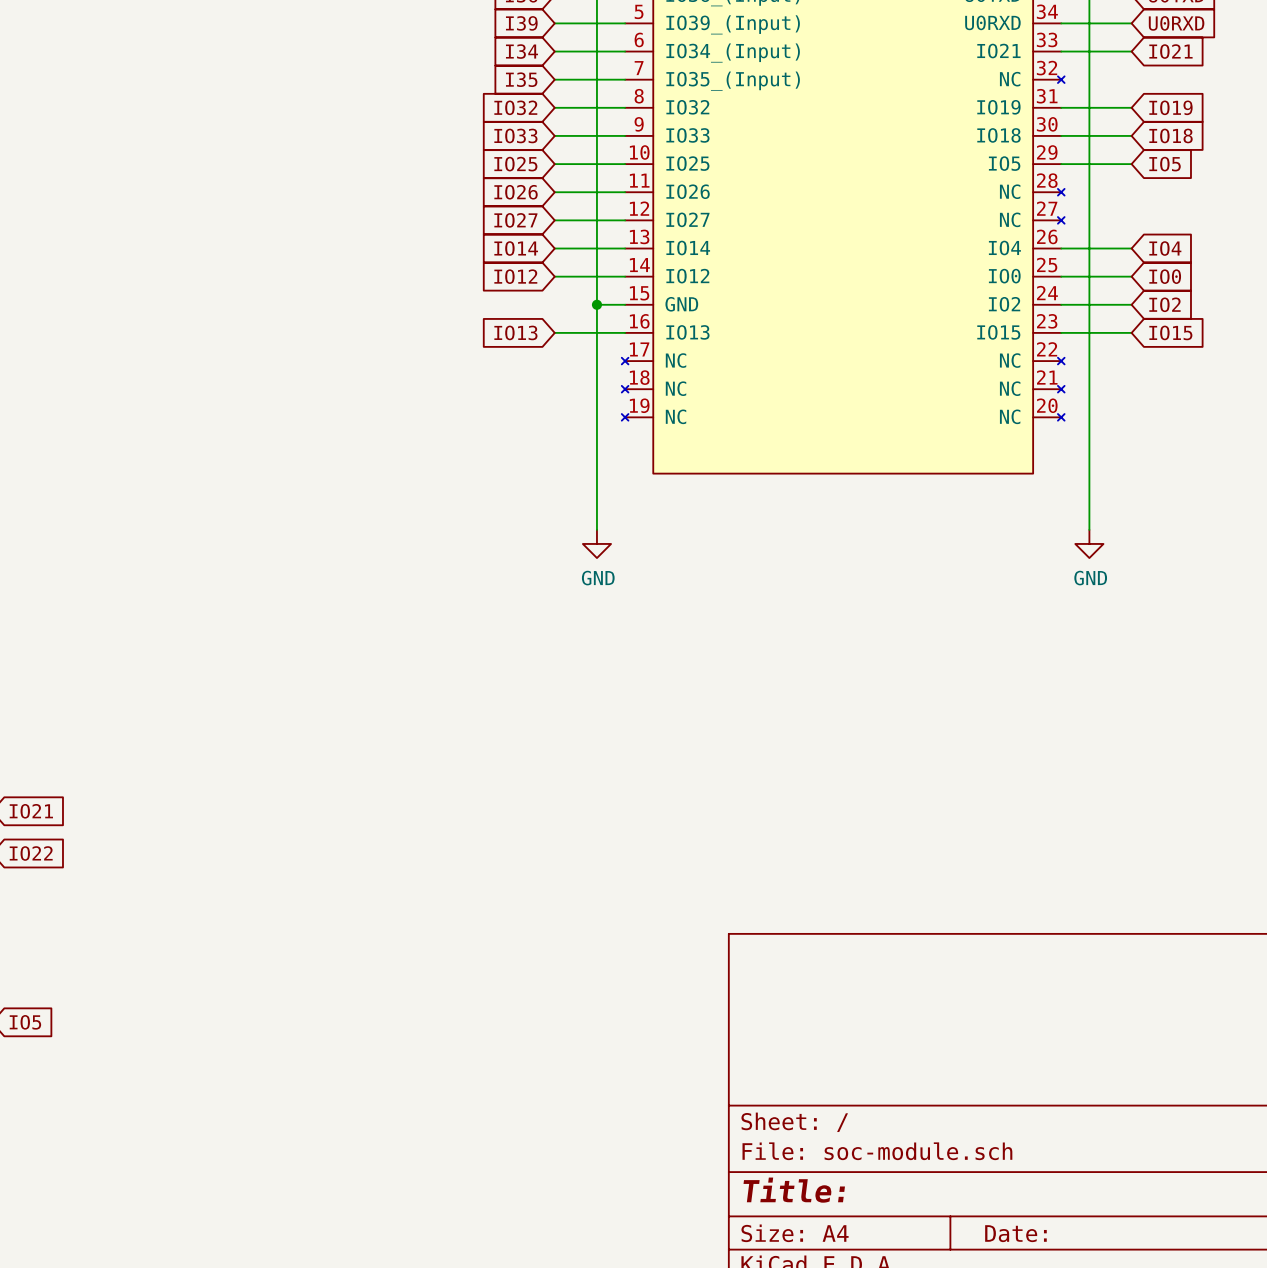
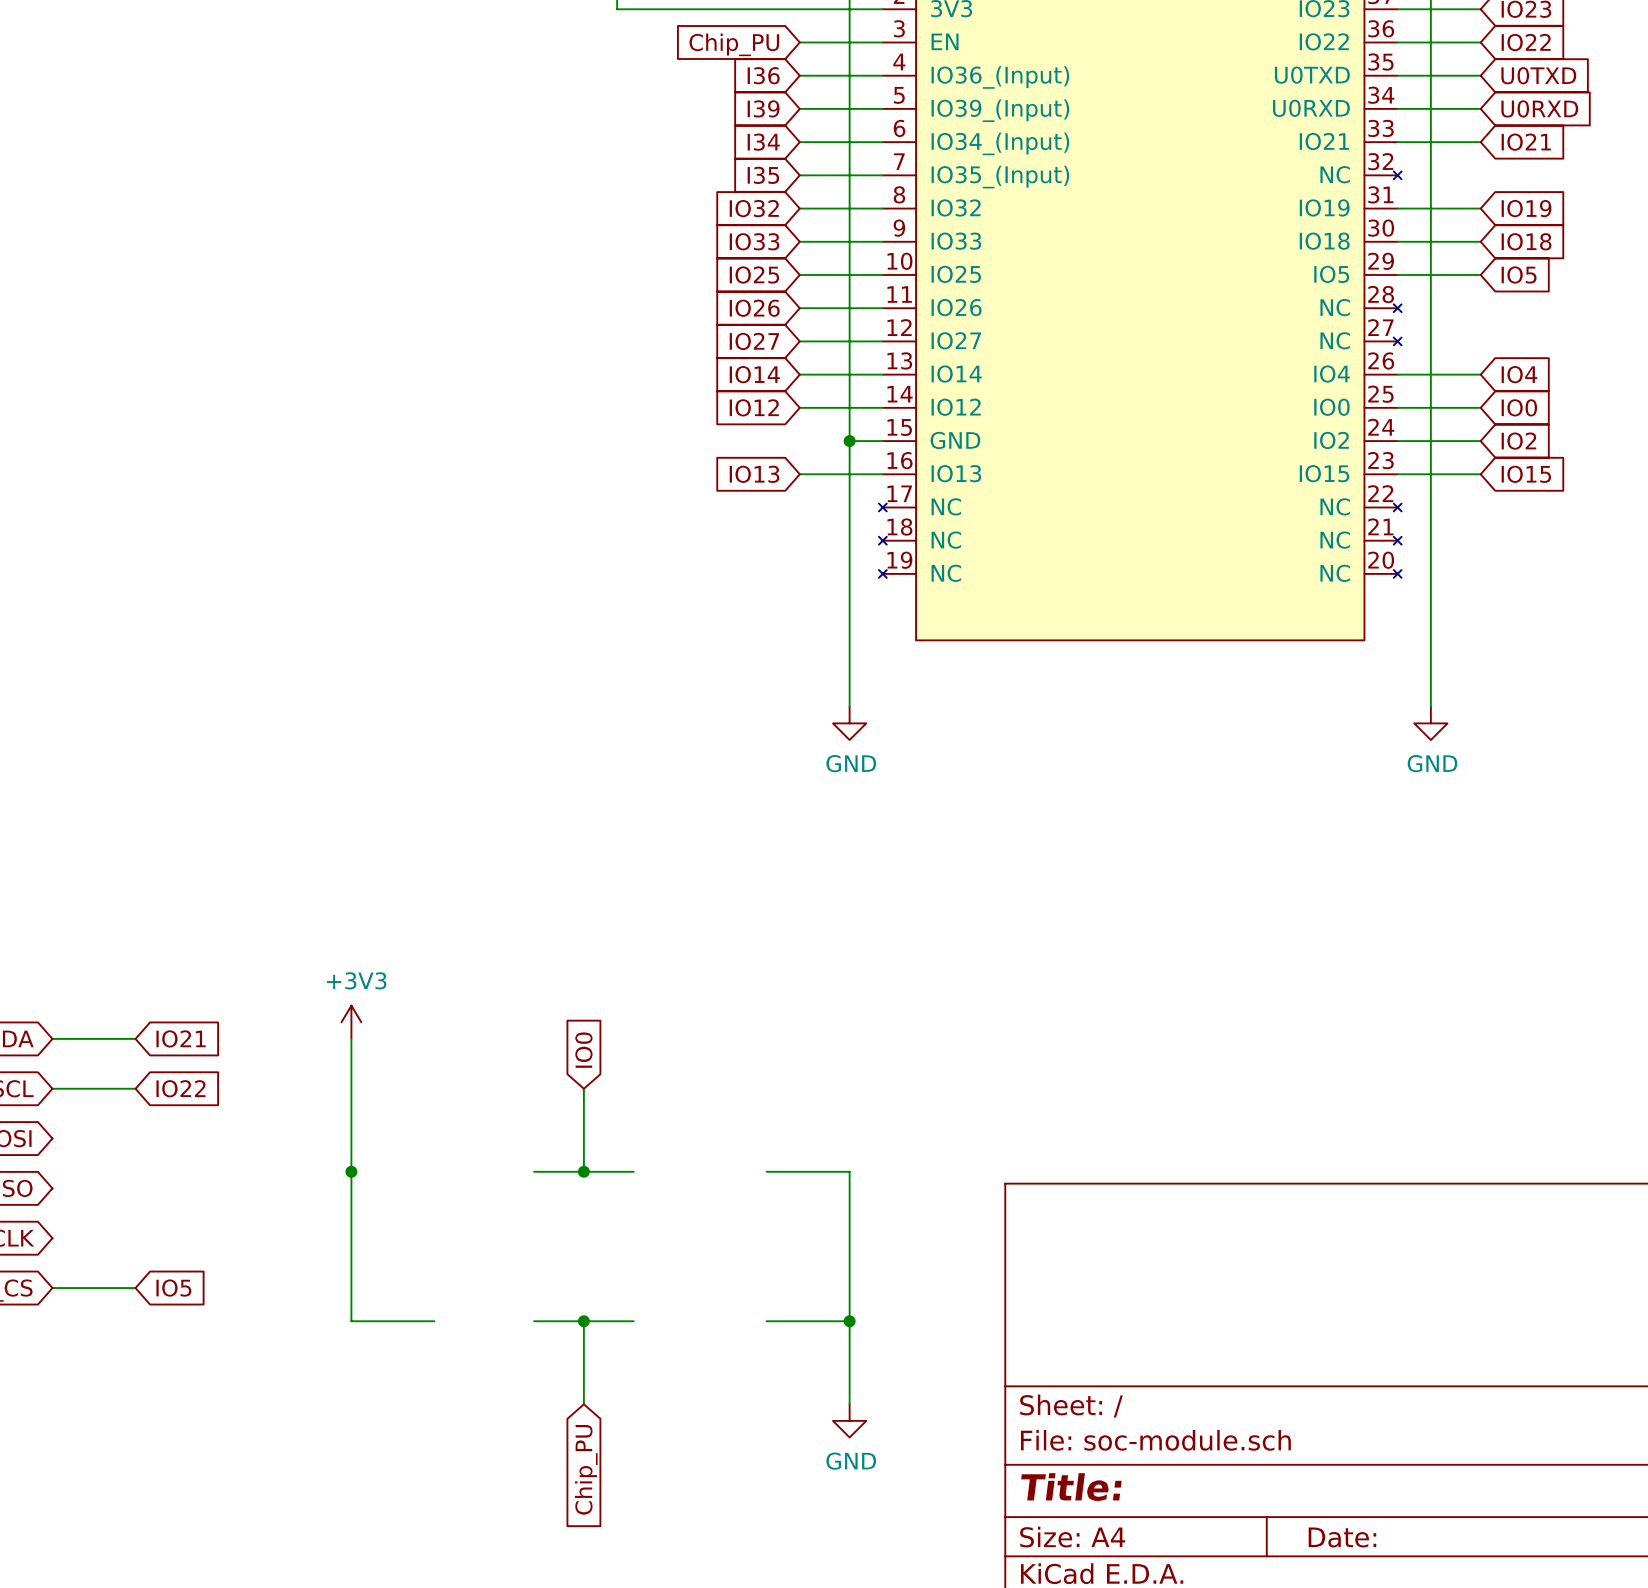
power symbol: none -> +3V3 (351, 1022)
wire: none -> (351, 1038) (351, 1321) (434, 1321)
global label: none -> IO0 (583, 1050)
wire: none -> (583, 1088) (583, 1171)
junction: none -> (351, 1171)
wire: none -> (534, 1171) (633, 1171)
junction: none -> (583, 1171)
wire: none -> (766, 1171) (849, 1171) (849, 1404)
wire: none -> (534, 1321) (633, 1321)
wire: none -> (583, 1321) (583, 1404)
junction: none -> (583, 1321)
wire: none -> (766, 1321) (849, 1321)
junction: none -> (849, 1321)
power symbol: none -> GND (849, 1420)
global label: none -> Chip_PU (586, 1469)

